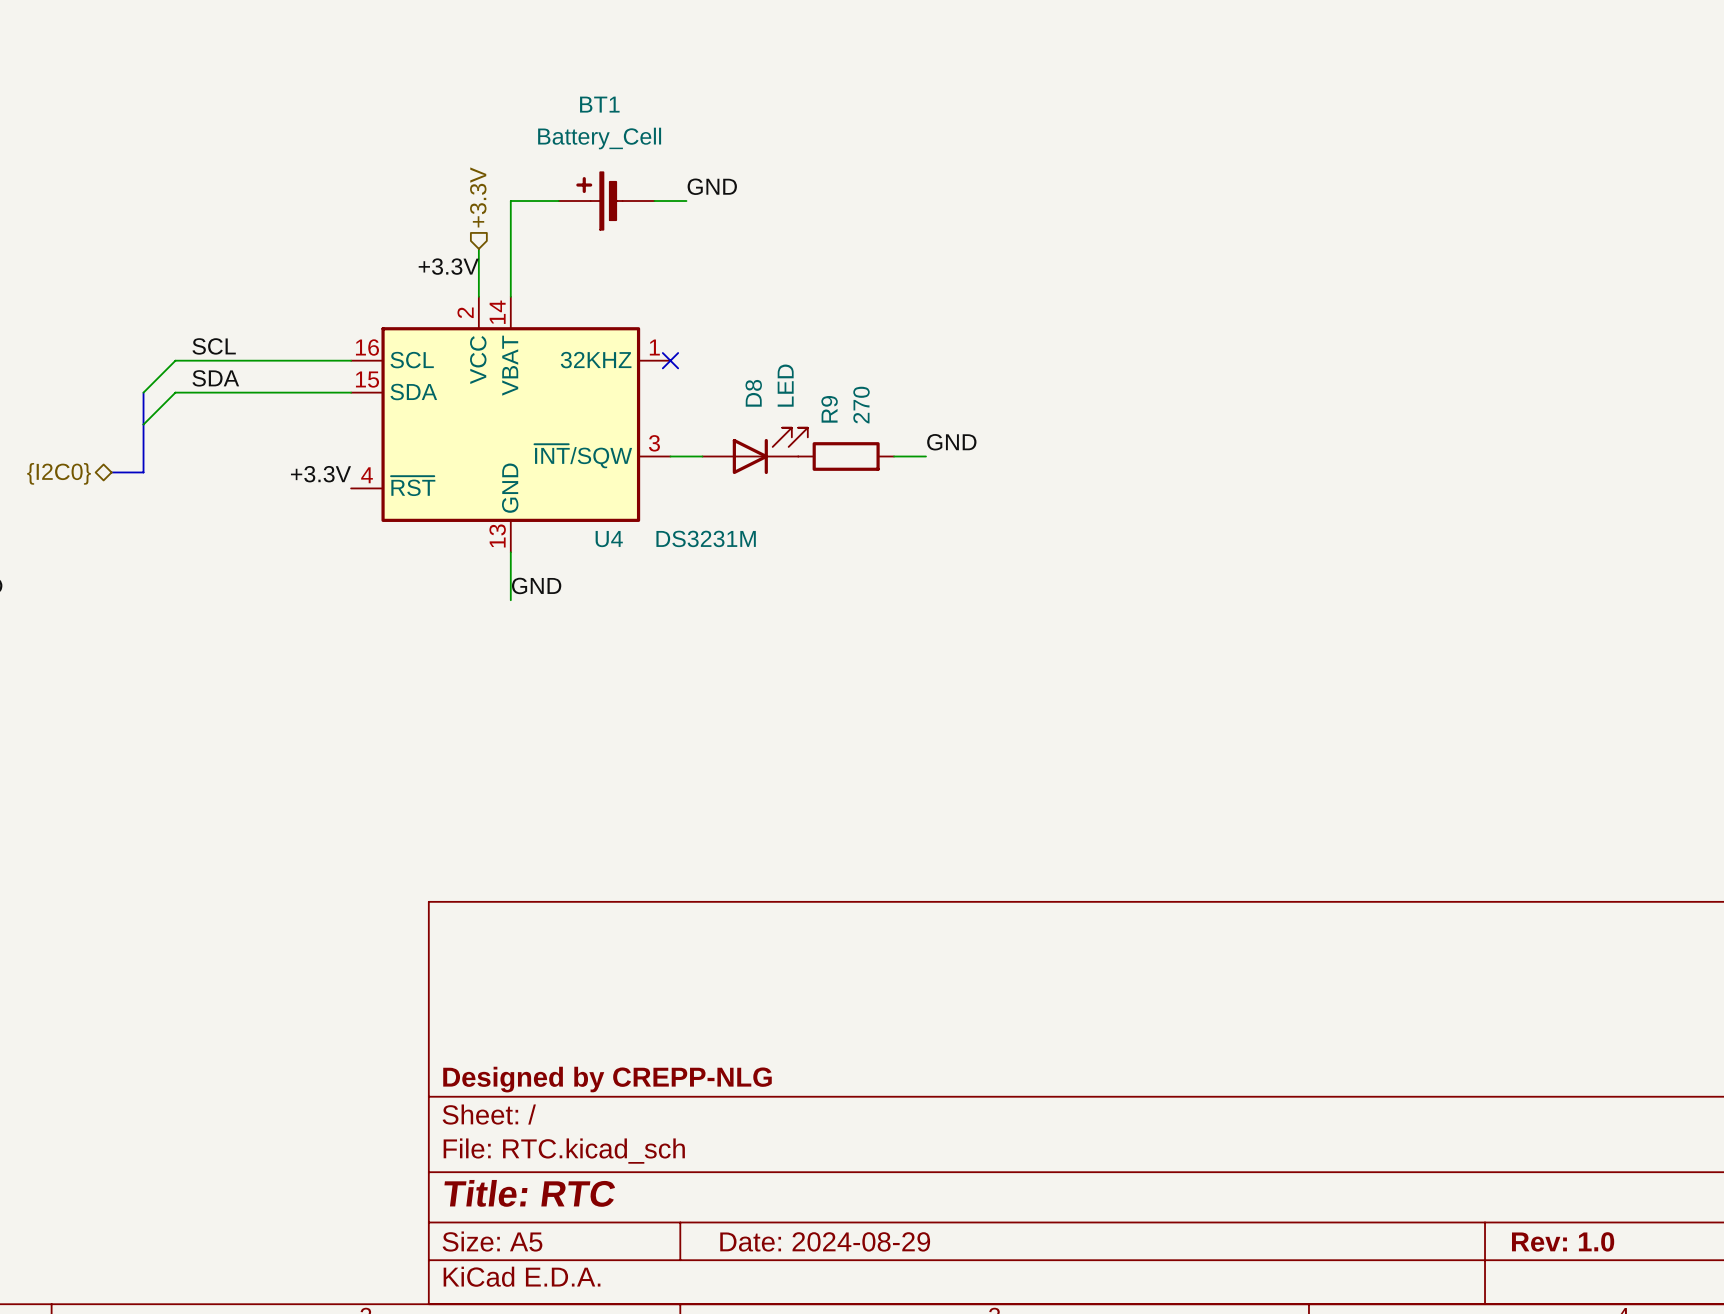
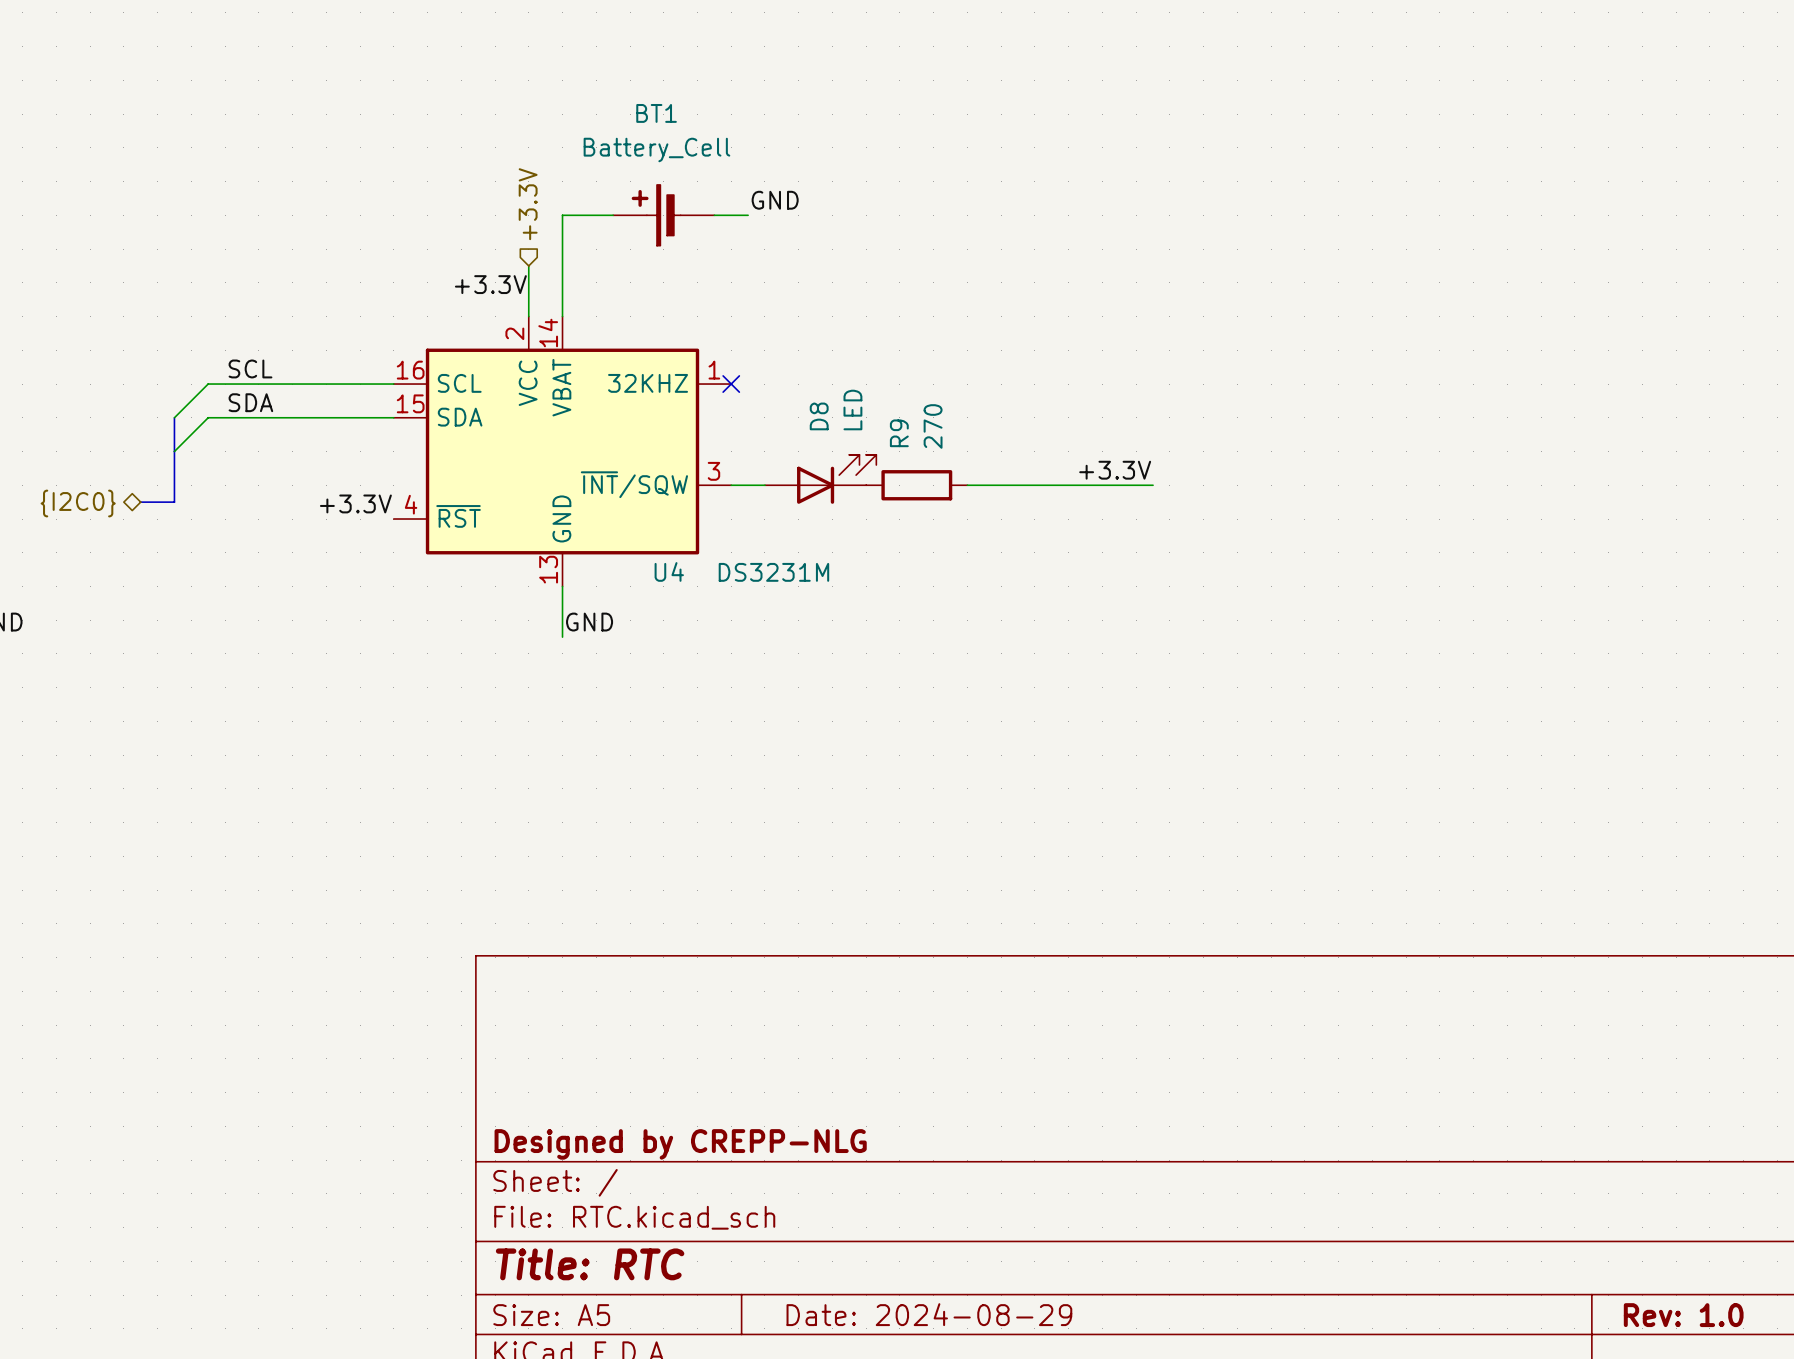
label: GND (951, 442) -> none
label: none -> +3.3V (1115, 470)
wire: none -> (1001, 485) (1153, 485)

